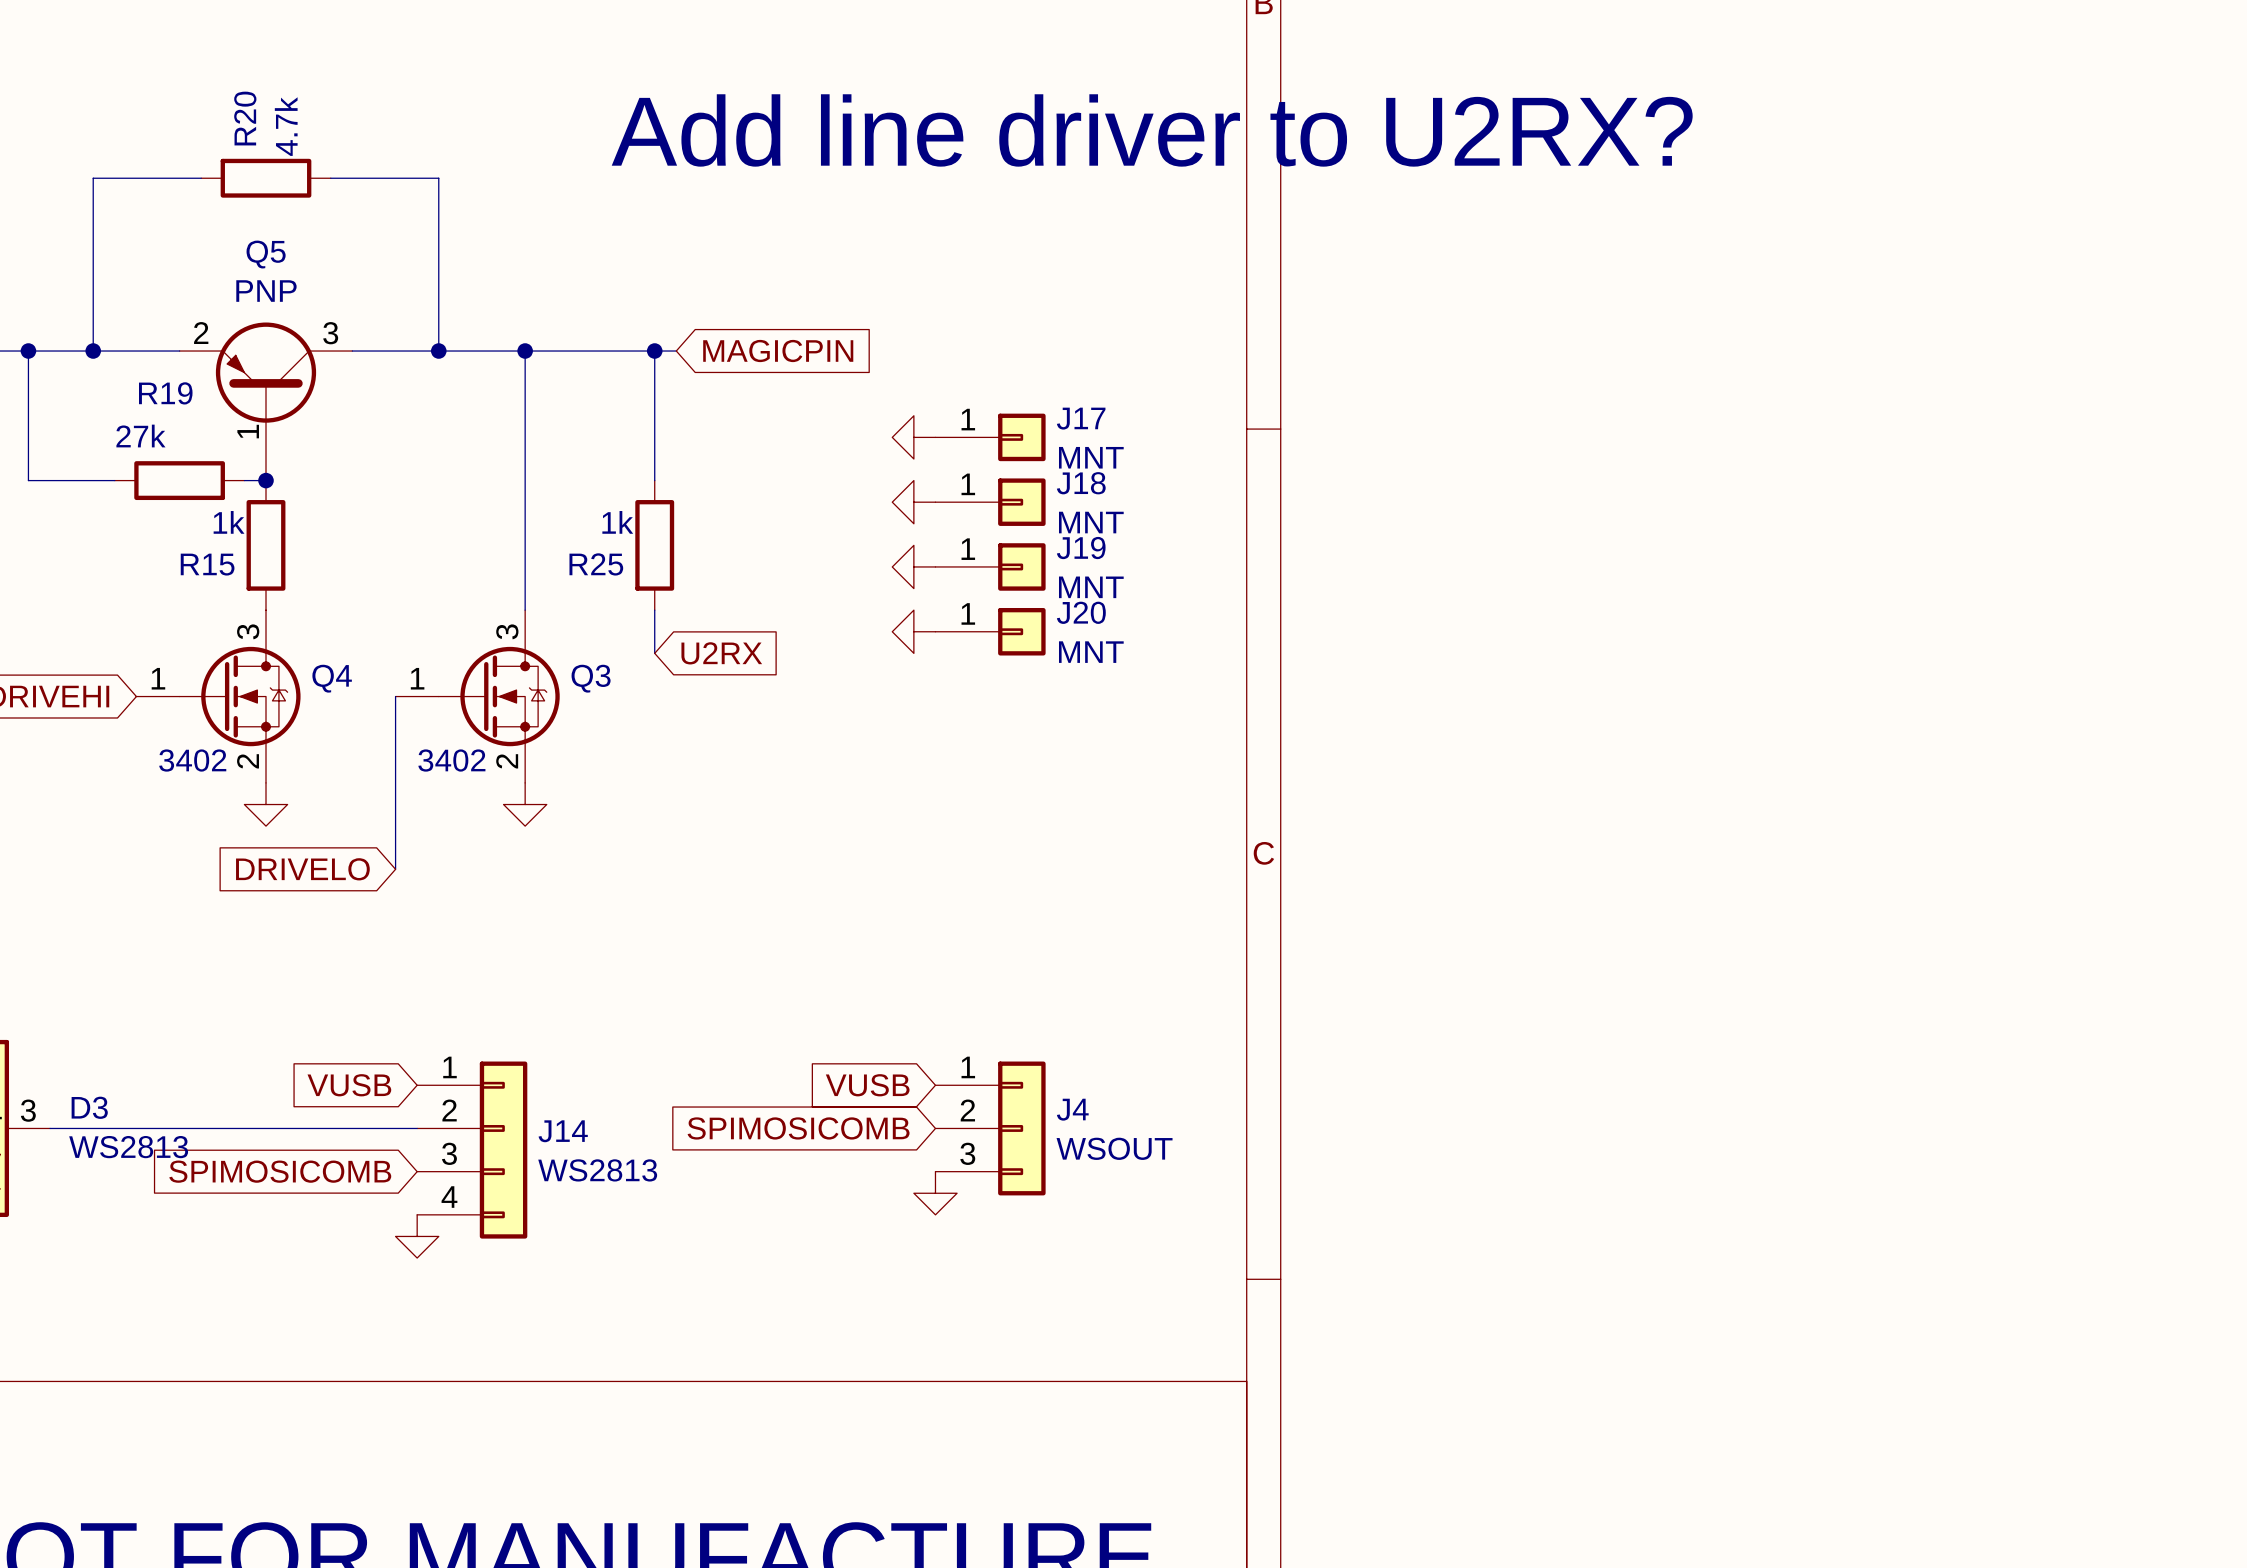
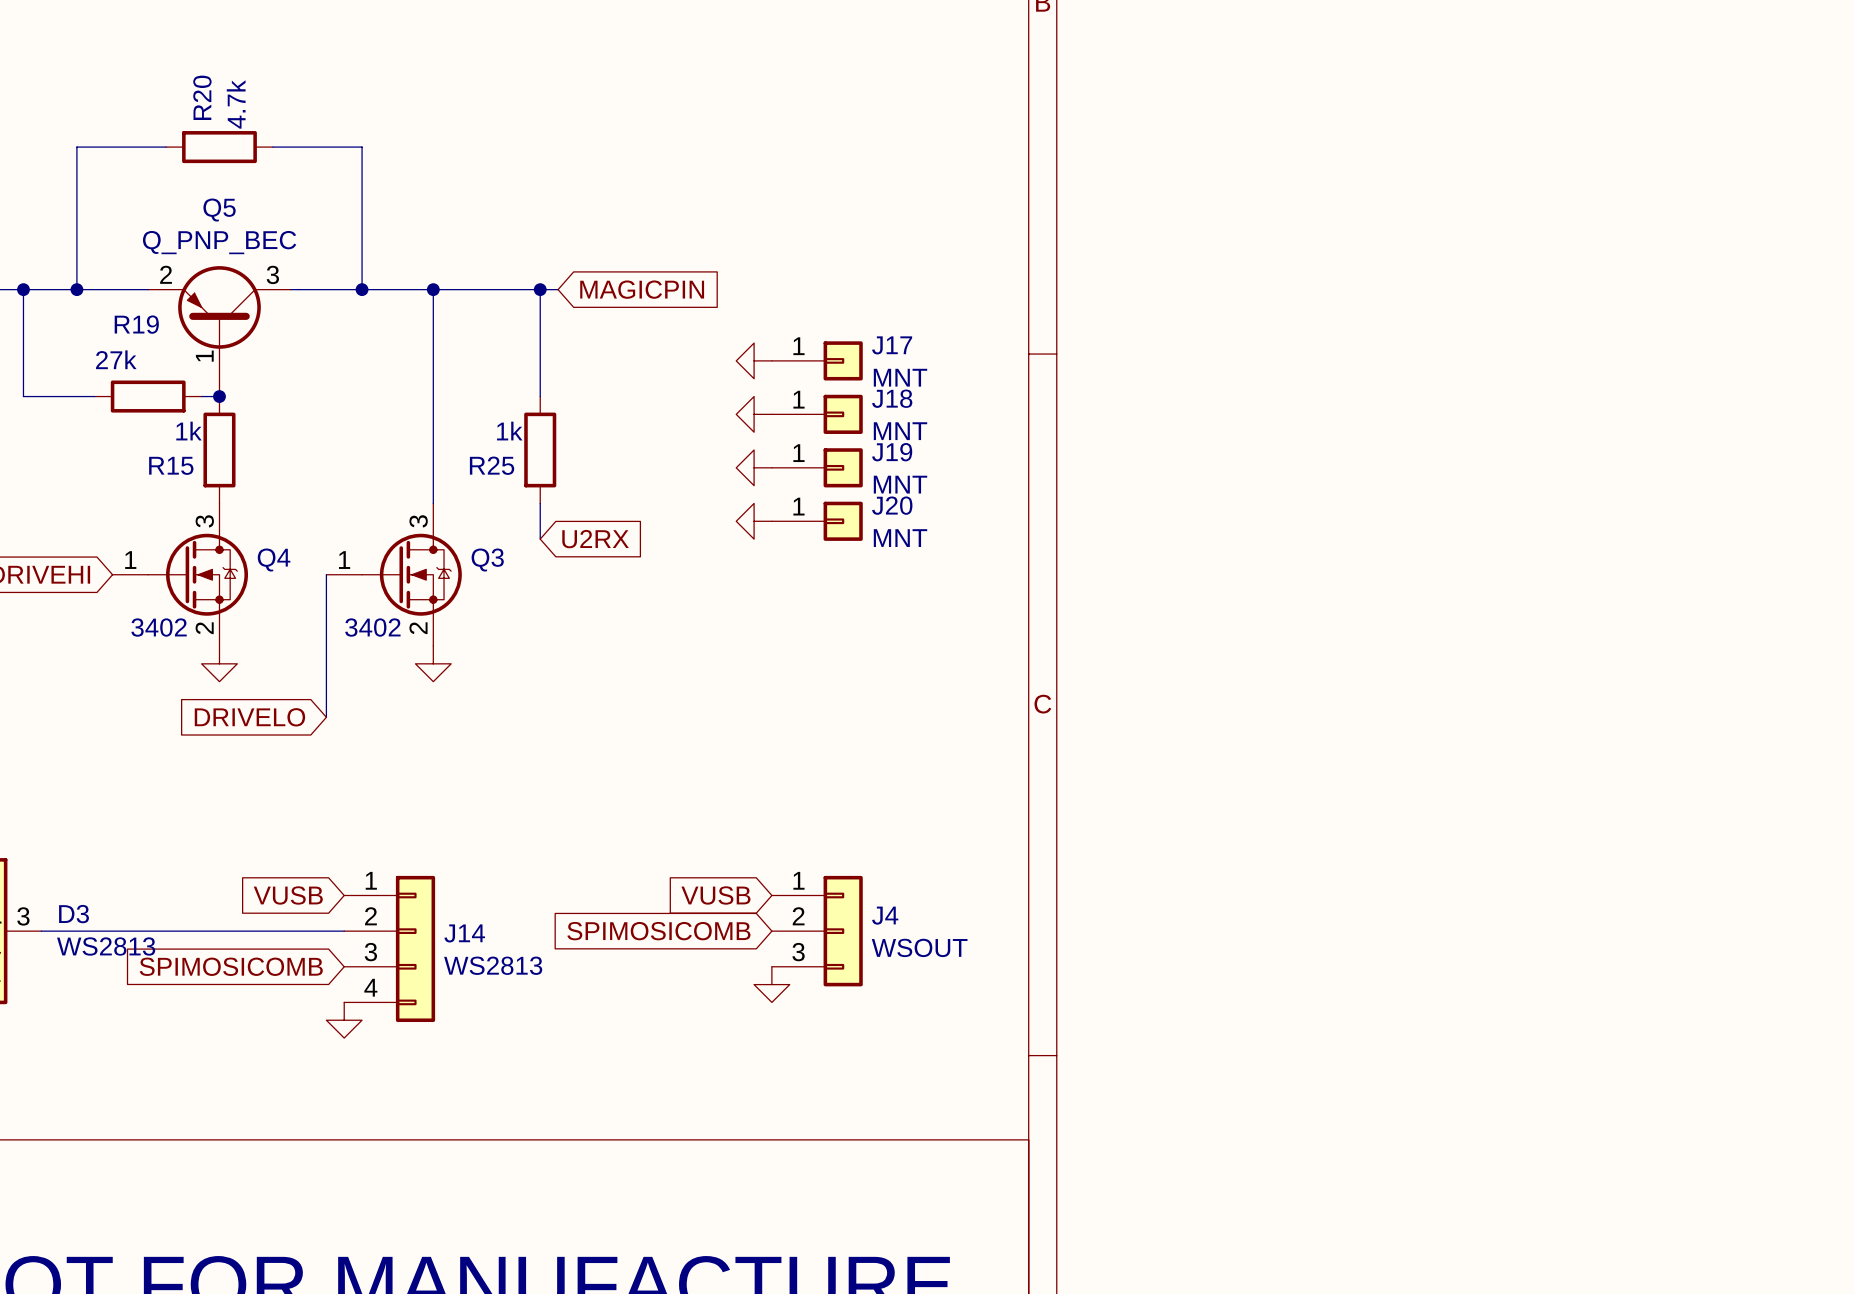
text: Add line driver to U2RX? (1152, 130) -> none
Q5 value: PNP (266, 291) -> Q_PNP_BEC (219, 242)

